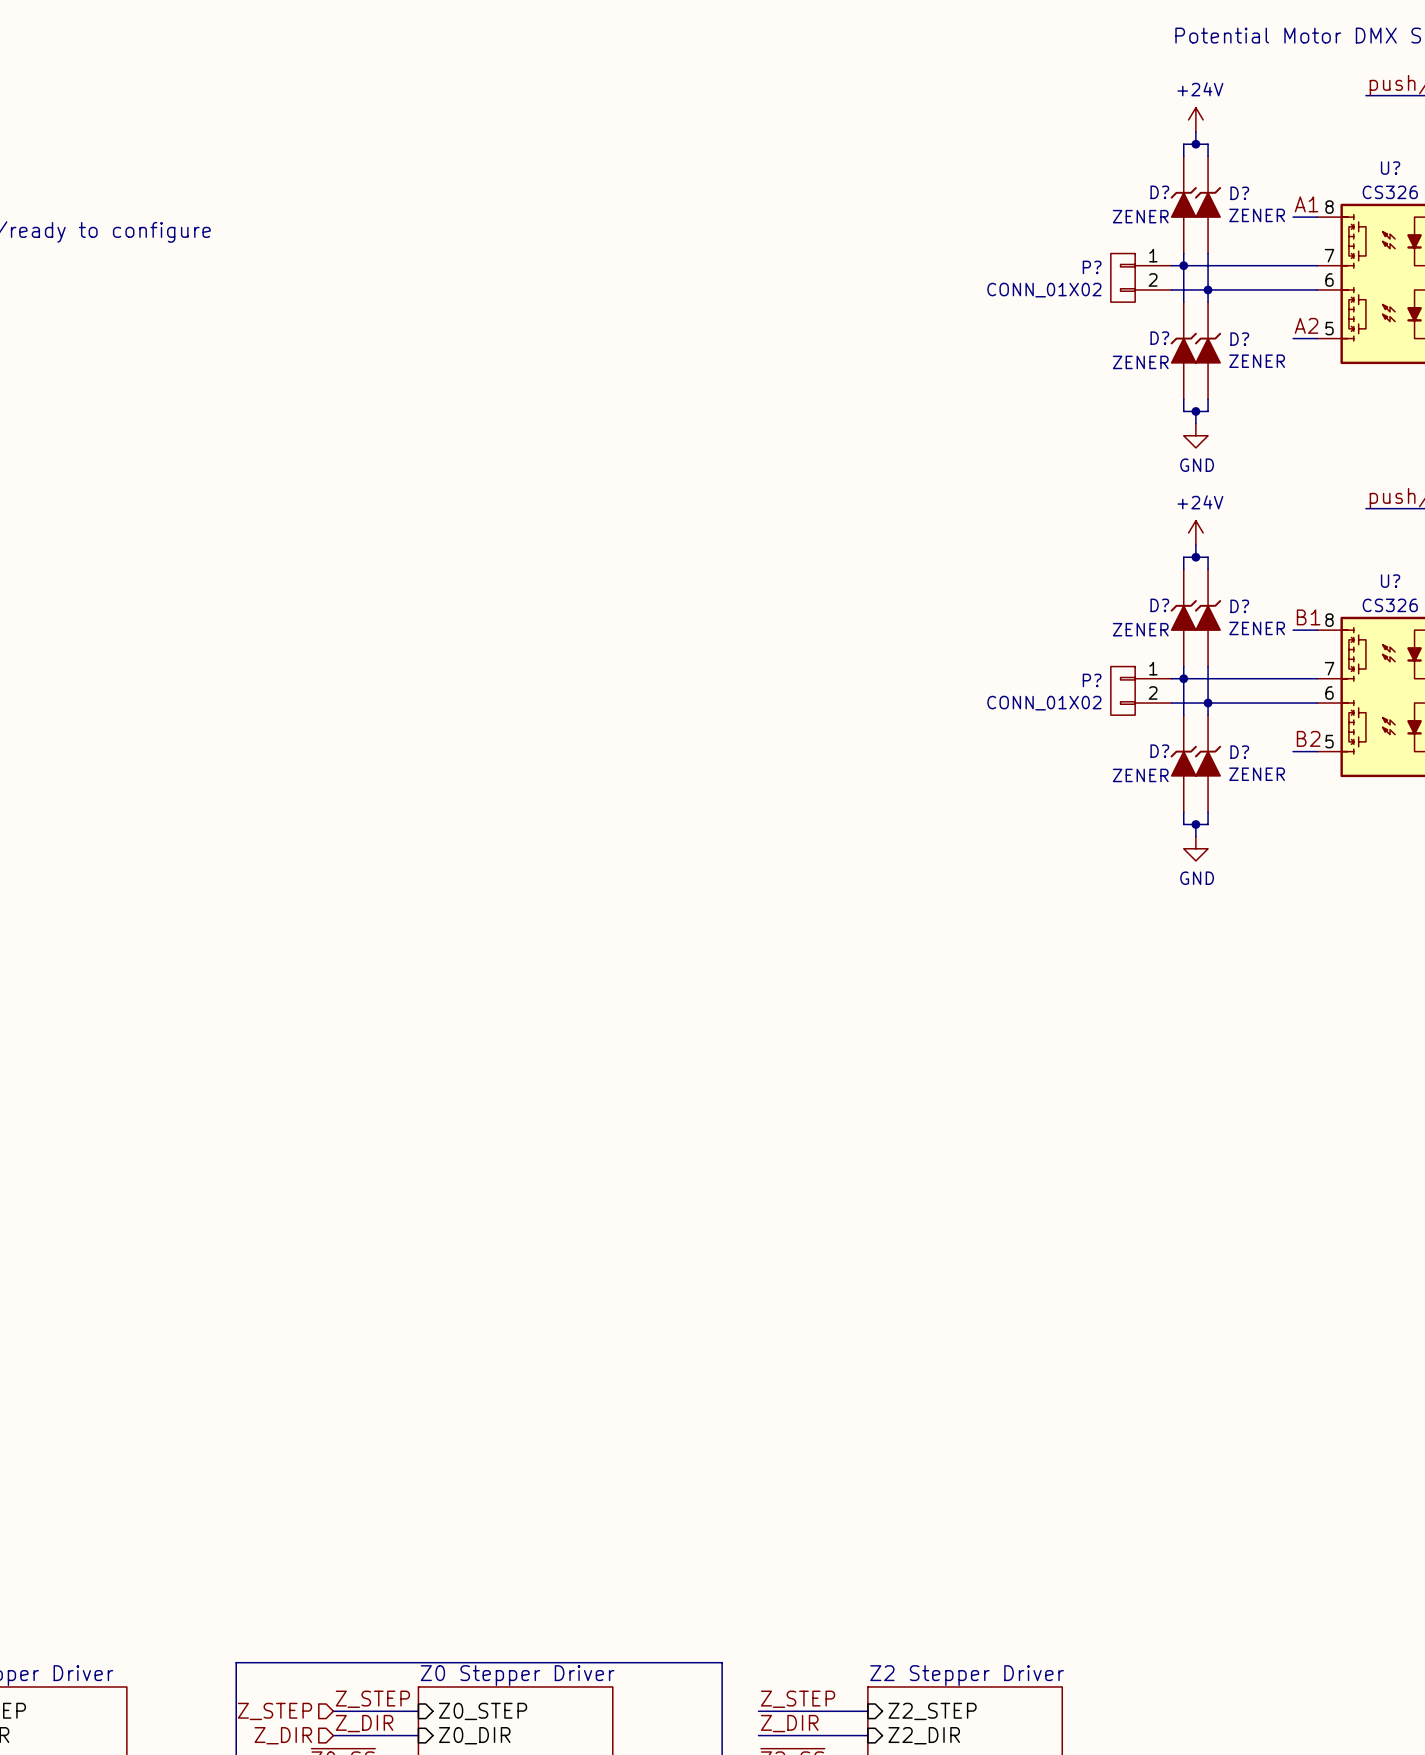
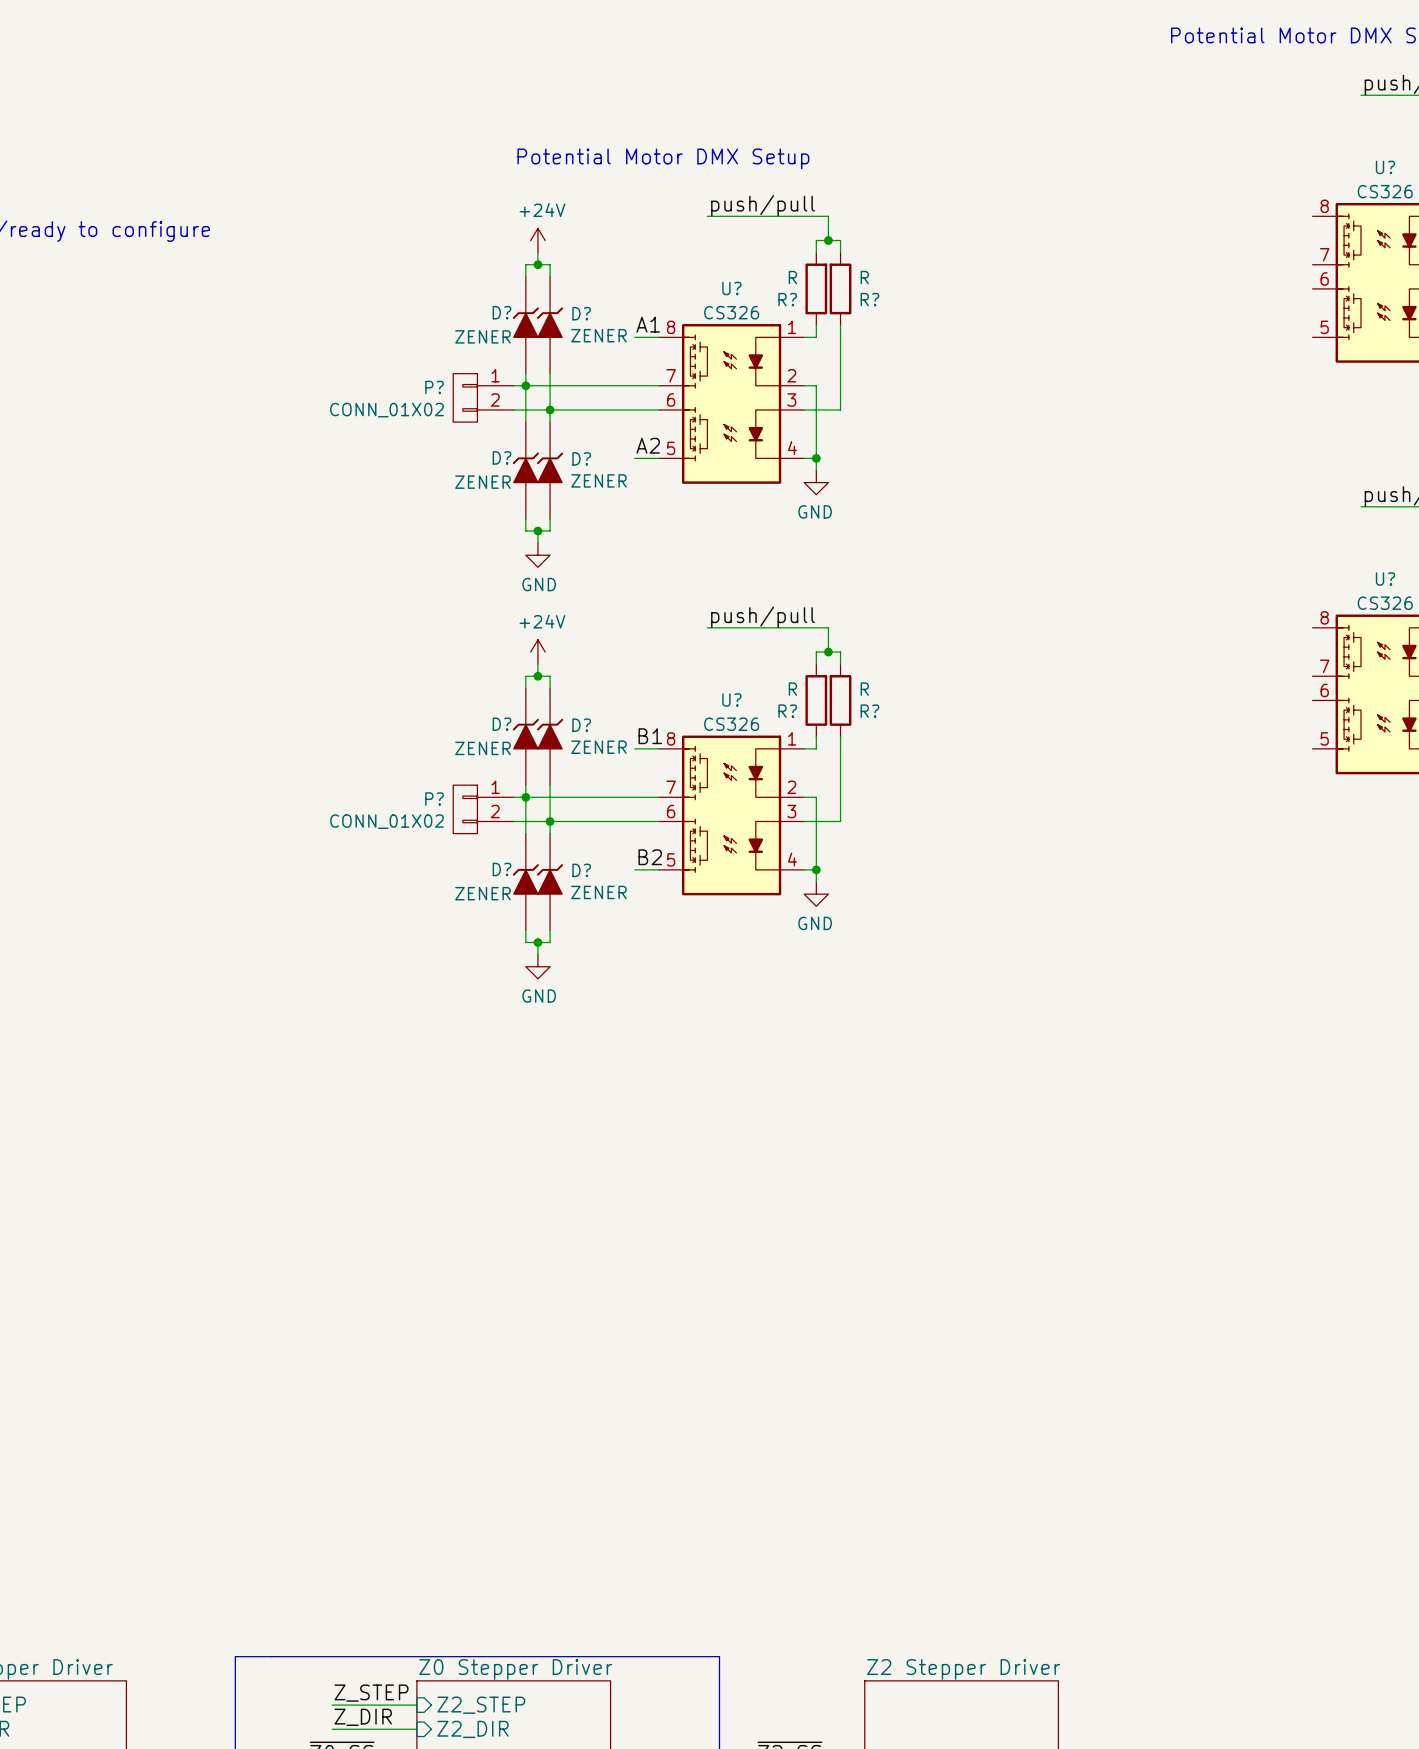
power symbol: +24V (1195, 119) -> none
wire: (1195, 132) (1195, 144) -> none
junction: (1195, 144) -> none
wire: (1183, 156) (1183, 144) (1208, 144) (1208, 156) -> none
text: none -> Potential Motor DMX Setup (663, 158)
D?: ZENER (1183, 204) -> none
D?: ZENER (1208, 204) -> none
label: A1 (1306, 204) -> none
label: none -> push/pull (762, 205)
wire: none -> (707, 216) (828, 216) (828, 240)
wire: (1293, 217) (1317, 217) -> none
power symbol: none -> +24V (537, 240)
junction: none -> (828, 240)
wire: none -> (537, 252) (537, 264)
wire: none -> (816, 252) (816, 240) (840, 240) (840, 252)
wire: (1183, 253) (1183, 302) -> none
wire: (1208, 253) (1208, 302) -> none
junction: none -> (537, 264)
wire: (1171, 265) (1317, 265) -> none
junction: (1183, 265) -> none
wire: none -> (525, 276) (525, 264) (550, 264) (550, 276)
P?: CONN_01X02 (1141, 277) -> none
R?: none -> R (816, 288)
R?: none -> R (840, 288)
wire: (1171, 289) (1317, 289) -> none
junction: (1208, 289) -> none
label: none -> A1 (648, 324)
label: A2 (1306, 325) -> none
D?: none -> ZENER (525, 325)
D?: none -> ZENER (550, 325)
wire: none -> (816, 325) (816, 337) (804, 337)
wire: none -> (840, 325) (840, 409) (804, 409)
wire: none -> (634, 337) (658, 337)
wire: (1293, 338) (1317, 338) -> none
D?: ZENER (1183, 350) -> none
D?: ZENER (1208, 350) -> none
wire: none -> (525, 373) (525, 422)
wire: none -> (550, 373) (550, 422)
wire: none -> (513, 385) (658, 385)
junction: none -> (525, 385)
wire: none -> (804, 385) (816, 385) (816, 470)
P?: none -> CONN_01X02 (483, 397)
wire: (1183, 399) (1183, 411) (1208, 411) (1208, 399) -> none
U?: none -> CS326 (731, 403)
wire: none -> (513, 409) (658, 409)
junction: none -> (550, 409)
wire: (1195, 411) (1195, 423) -> none
junction: (1195, 411) -> none
power symbol: GND (1195, 435) -> none
label: none -> A2 (648, 445)
wire: none -> (634, 458) (658, 458)
wire: none -> (804, 458) (816, 458)
junction: none -> (816, 458)
D?: none -> ZENER (525, 470)
D?: none -> ZENER (550, 470)
power symbol: none -> GND (816, 482)
wire: none -> (525, 518) (525, 531) (550, 531) (550, 518)
wire: none -> (537, 531) (537, 543)
junction: none -> (537, 531)
power symbol: +24V (1195, 532) -> none
wire: (1195, 545) (1195, 557) -> none
power symbol: none -> GND (537, 555)
junction: (1195, 557) -> none
wire: (1183, 569) (1183, 557) (1208, 557) (1208, 569) -> none
D?: ZENER (1183, 617) -> none
D?: ZENER (1208, 617) -> none
label: B1 (1308, 617) -> none
label: none -> push/pull (762, 617)
wire: none -> (707, 627) (828, 627) (828, 652)
wire: (1293, 630) (1317, 630) -> none
power symbol: none -> +24V (537, 652)
junction: none -> (828, 652)
wire: none -> (537, 664) (537, 676)
wire: none -> (816, 664) (816, 652) (840, 652) (840, 664)
wire: (1183, 666) (1183, 715) -> none
wire: (1208, 666) (1208, 715) -> none
junction: none -> (537, 676)
wire: (1171, 678) (1317, 678) -> none
junction: (1183, 678) -> none
wire: none -> (525, 688) (525, 676) (550, 676) (550, 688)
P?: CONN_01X02 (1141, 690) -> none
R?: none -> R (816, 700)
R?: none -> R (840, 700)
wire: (1171, 703) (1317, 703) -> none
junction: (1208, 703) -> none
label: none -> B1 (650, 736)
label: B2 (1308, 738) -> none
D?: none -> ZENER (525, 736)
D?: none -> ZENER (550, 736)
wire: none -> (816, 736) (816, 748) (804, 748)
wire: none -> (840, 736) (840, 821) (804, 821)
wire: none -> (634, 748) (658, 748)
wire: (1293, 751) (1317, 751) -> none
D?: ZENER (1183, 763) -> none
D?: ZENER (1208, 763) -> none
wire: none -> (525, 785) (525, 833)
wire: none -> (550, 785) (550, 833)
wire: none -> (513, 797) (658, 797)
junction: none -> (525, 797)
wire: none -> (804, 797) (816, 797) (816, 882)
P?: none -> CONN_01X02 (483, 809)
wire: (1183, 812) (1183, 824) (1208, 824) (1208, 812) -> none
U?: none -> CS326 (731, 815)
wire: none -> (513, 821) (658, 821)
junction: none -> (550, 821)
wire: (1195, 824) (1195, 836) -> none
junction: (1195, 824) -> none
power symbol: GND (1195, 848) -> none
label: none -> B2 (650, 857)
wire: none -> (634, 869) (658, 869)
wire: none -> (804, 869) (816, 869)
junction: none -> (816, 869)
D?: none -> ZENER (525, 882)
D?: none -> ZENER (550, 882)
power symbol: none -> GND (816, 894)
wire: none -> (525, 930) (525, 942) (550, 942) (550, 930)
wire: none -> (537, 942) (537, 954)
junction: none -> (537, 942)
power symbol: none -> GND (537, 966)
label: Z_STEP (798, 1699) -> none
hierarchical label: Z_STEP (274, 1711) -> none
sheet pin: Z0_STEP (483, 1711) -> Z2_STEP (481, 1705)
wire: (758, 1711) (867, 1711) -> none
sheet pin: Z2_STEP (932, 1711) -> none
label: Z_DIR (789, 1723) -> none
hierarchical label: Z_DIR (283, 1735) -> none
sheet pin: Z0_DIR (474, 1735) -> Z2_DIR (473, 1729)
wire: (758, 1735) (867, 1735) -> none
sheet pin: Z2_DIR (924, 1735) -> none

